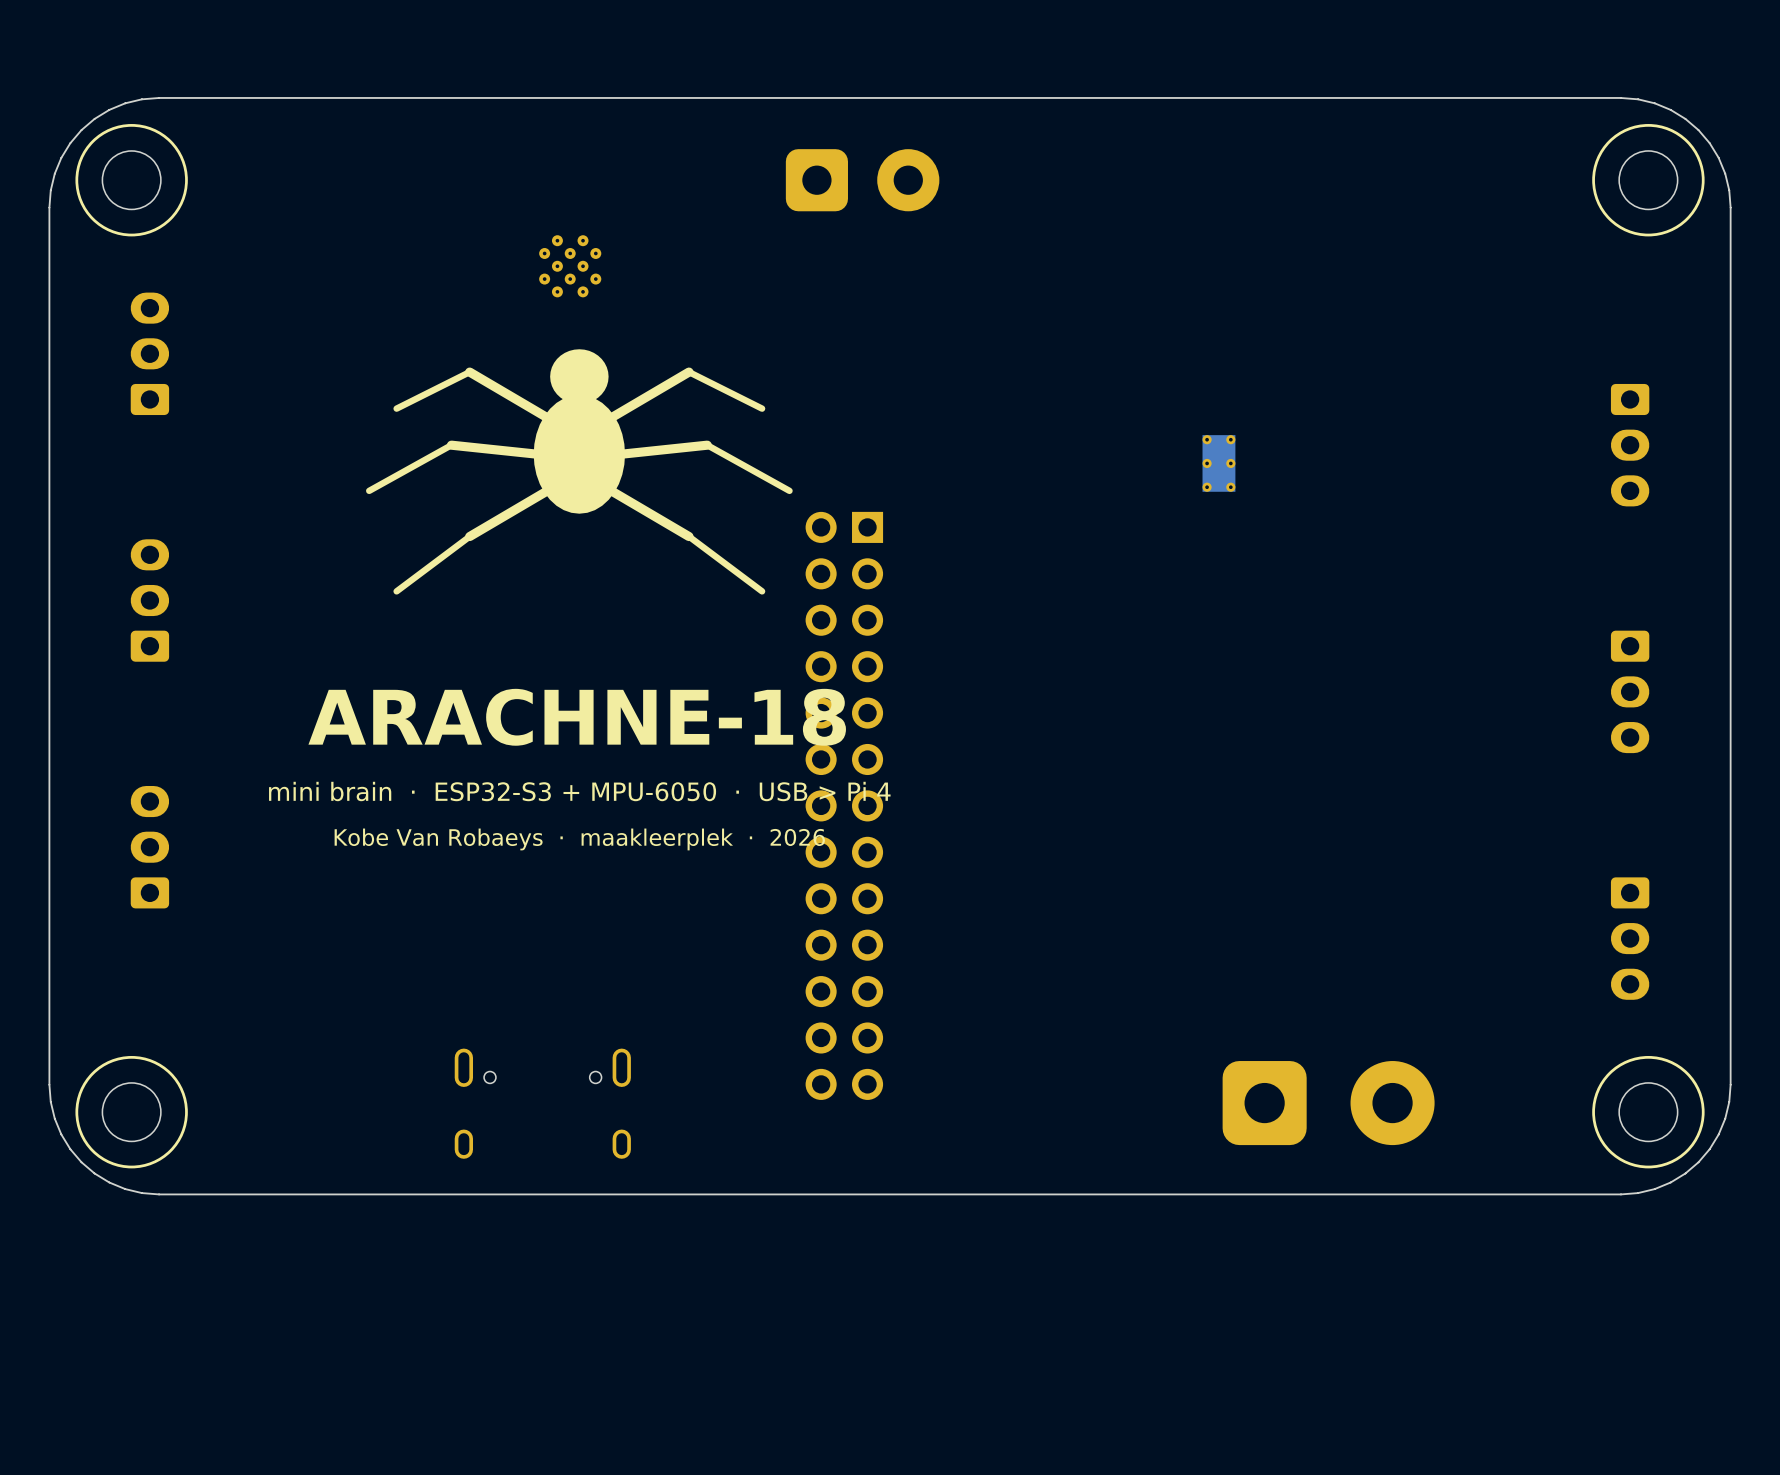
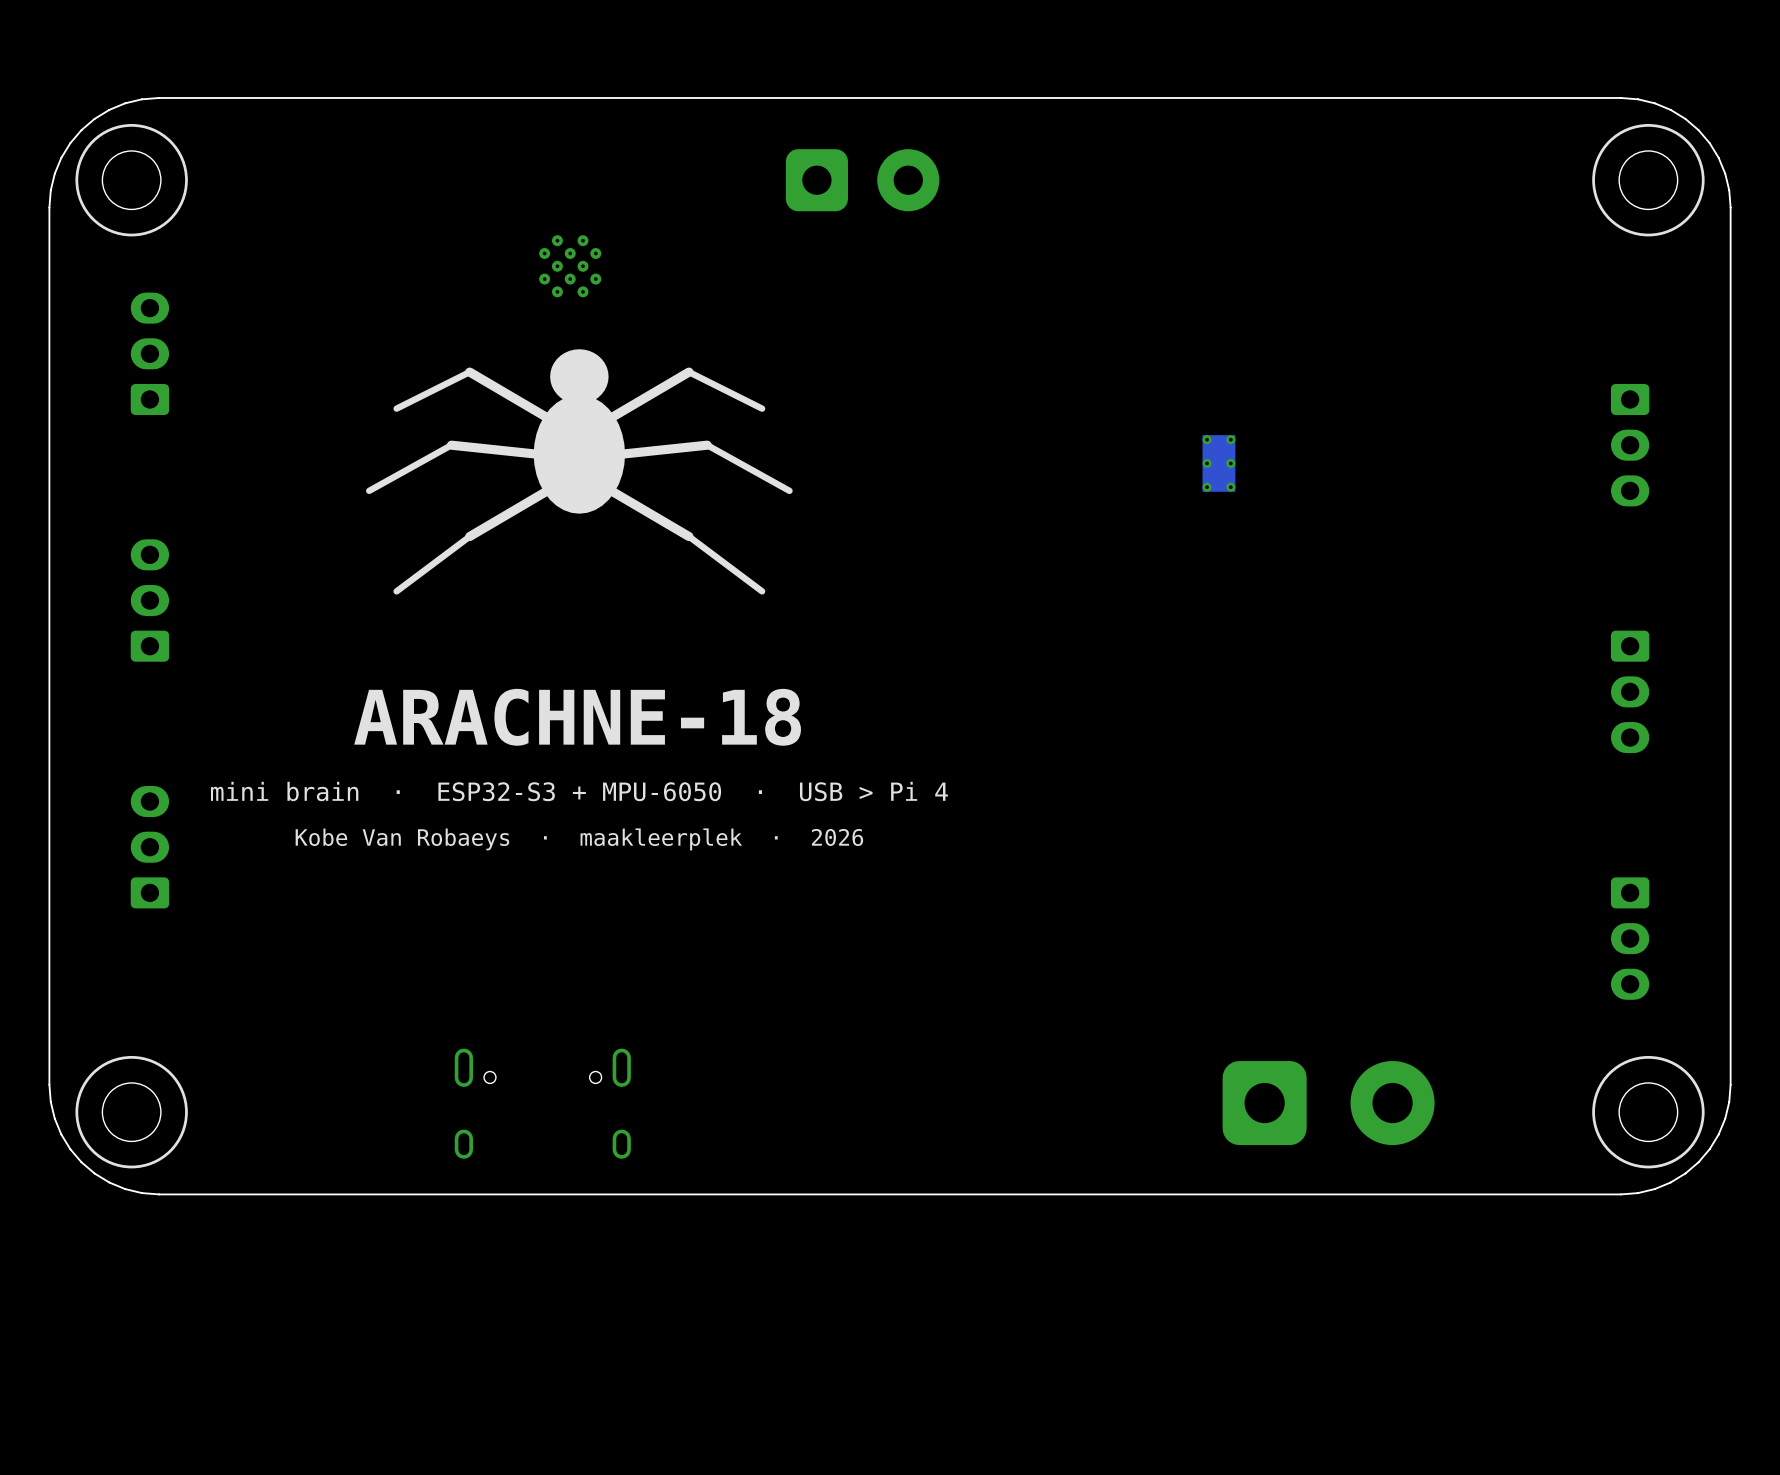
part: (844, 805) -> none

